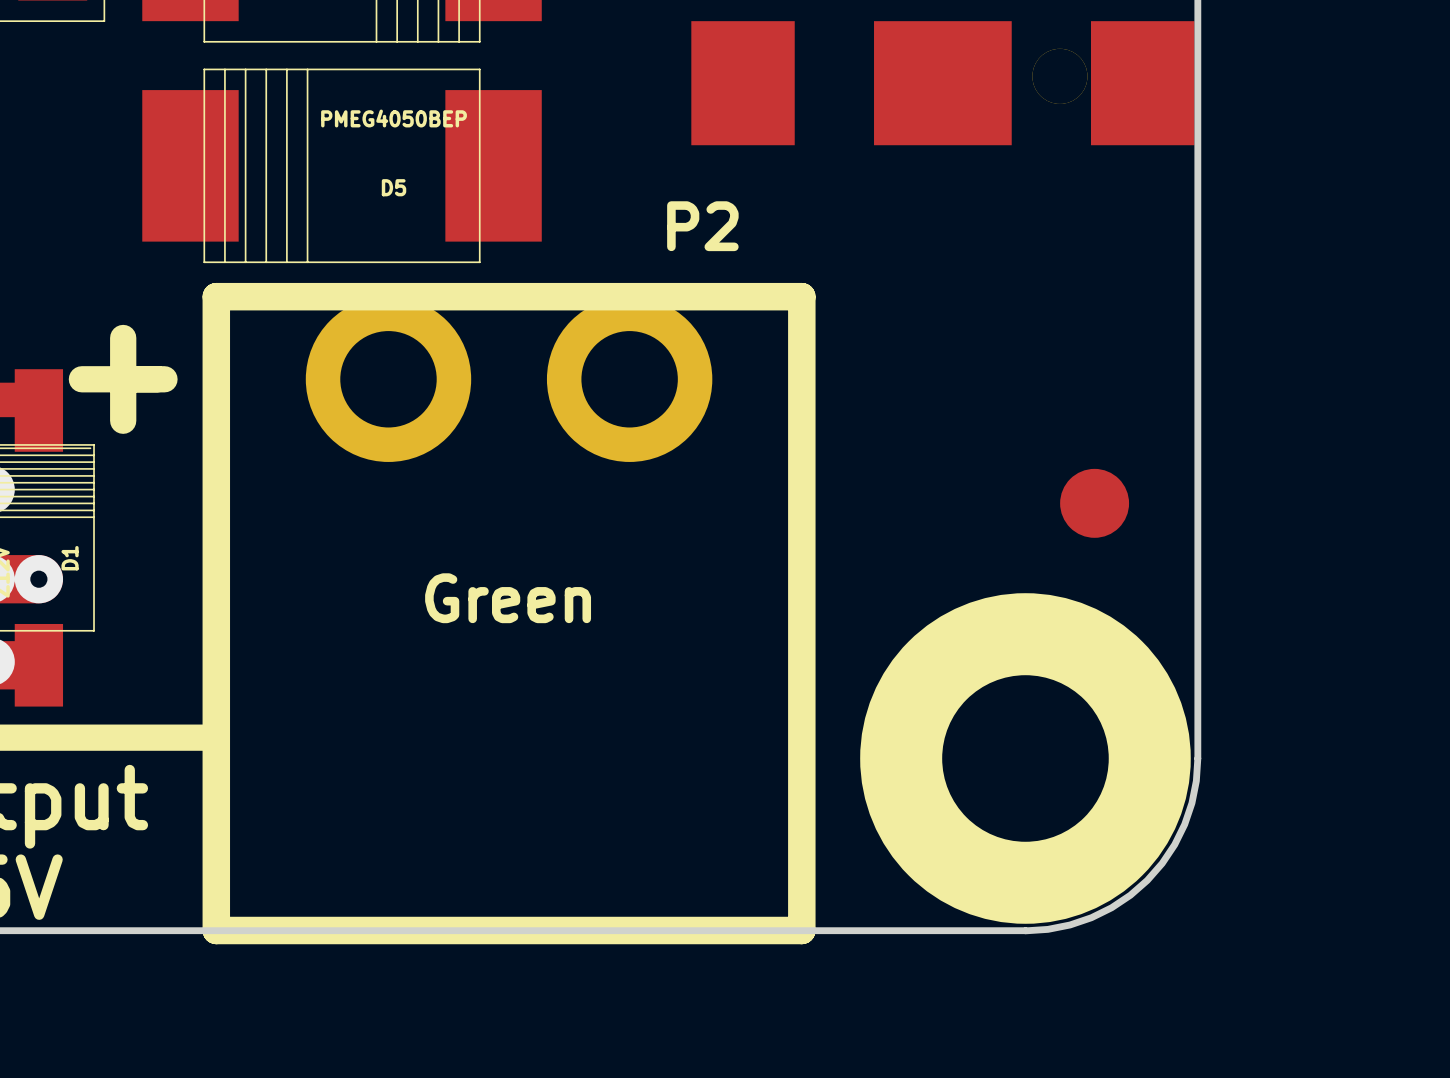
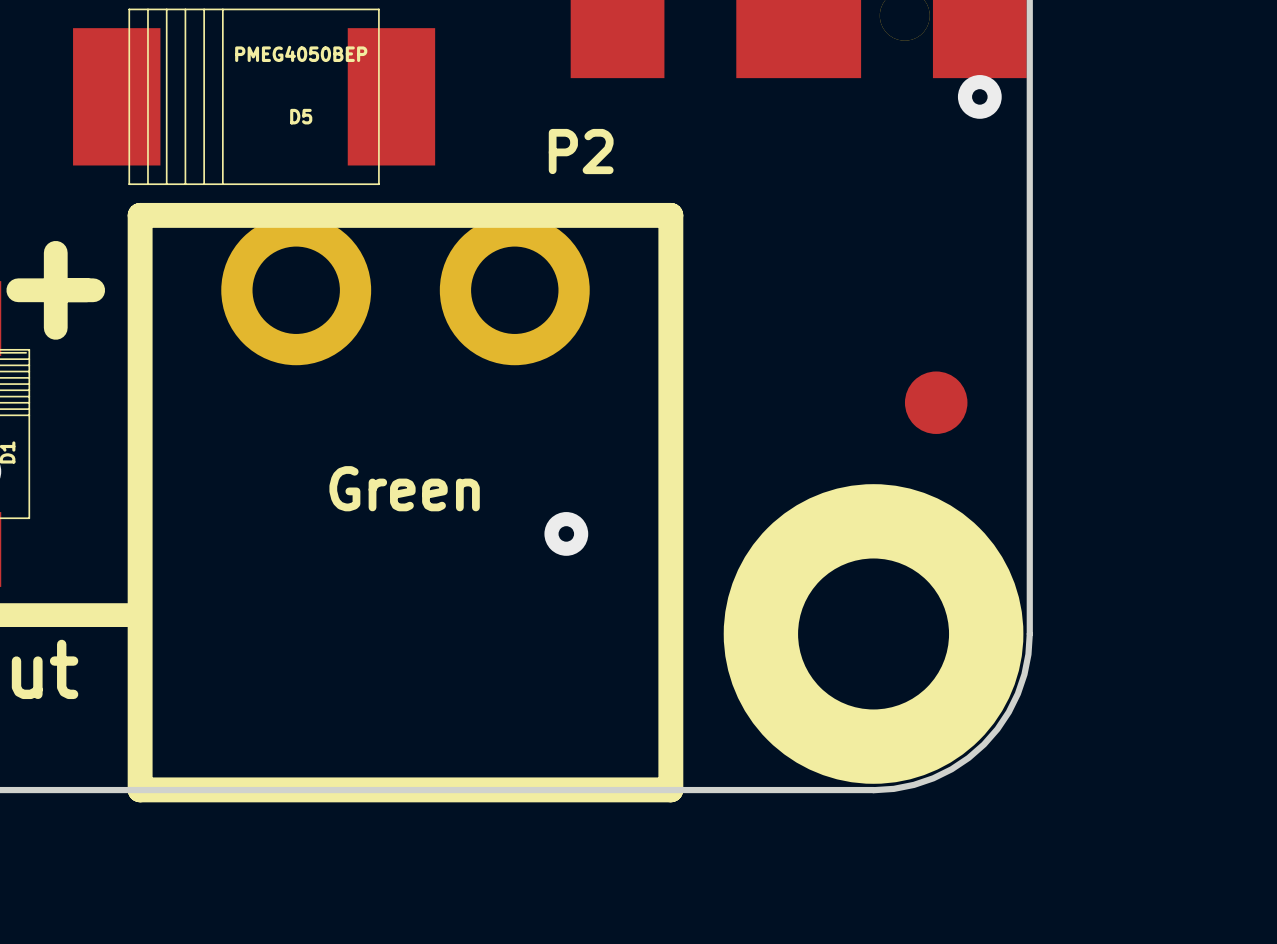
via: none -> (979, 96)
via: none -> (566, 533)

